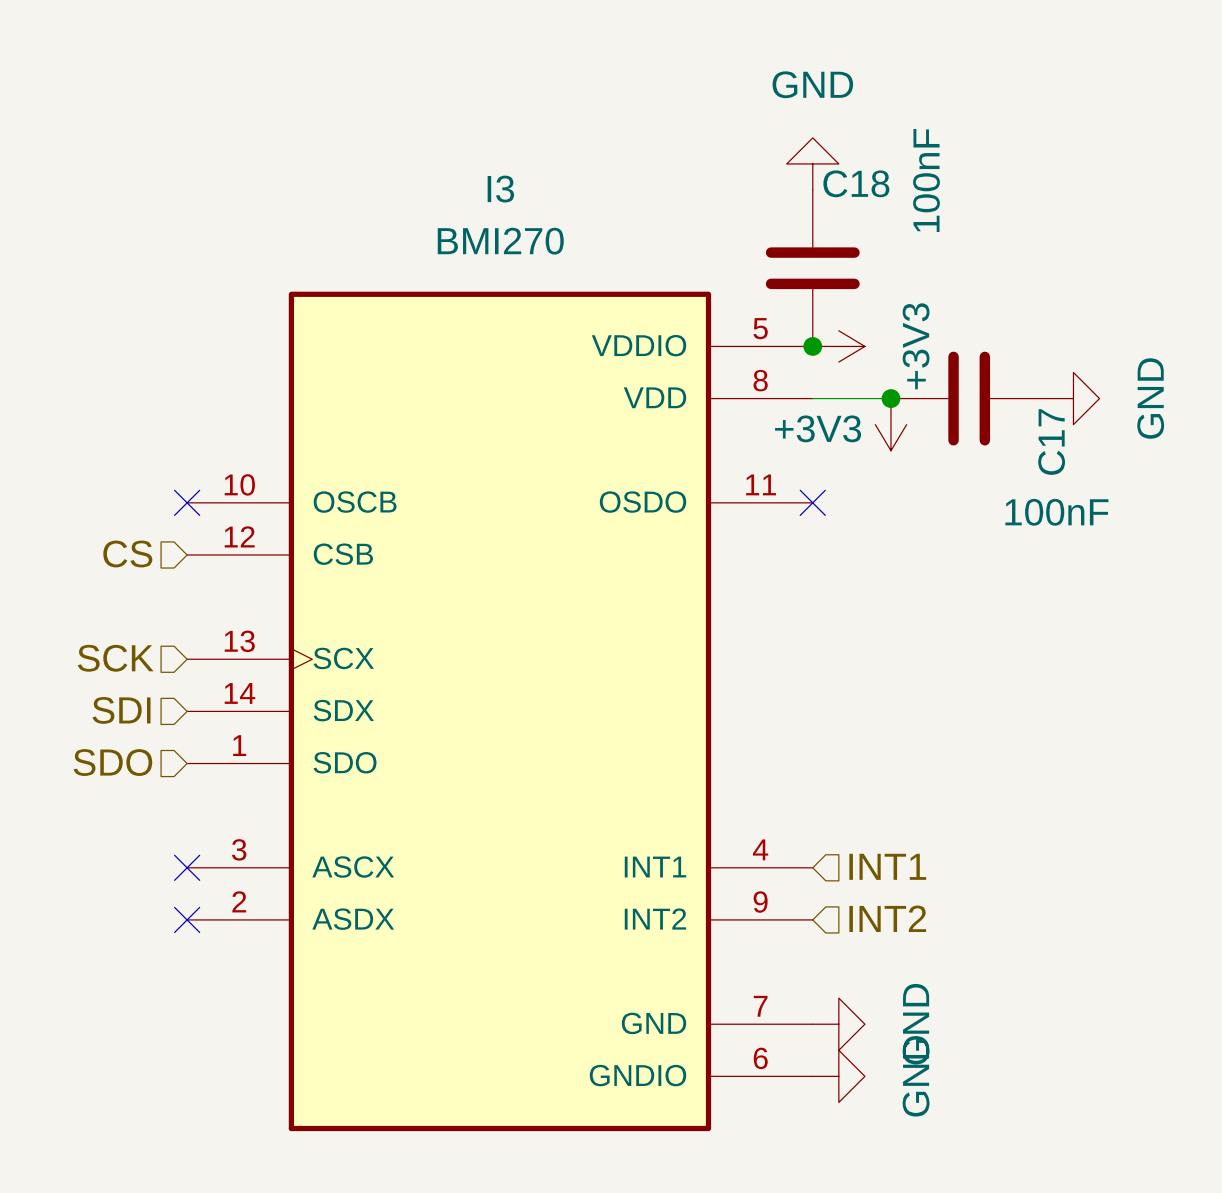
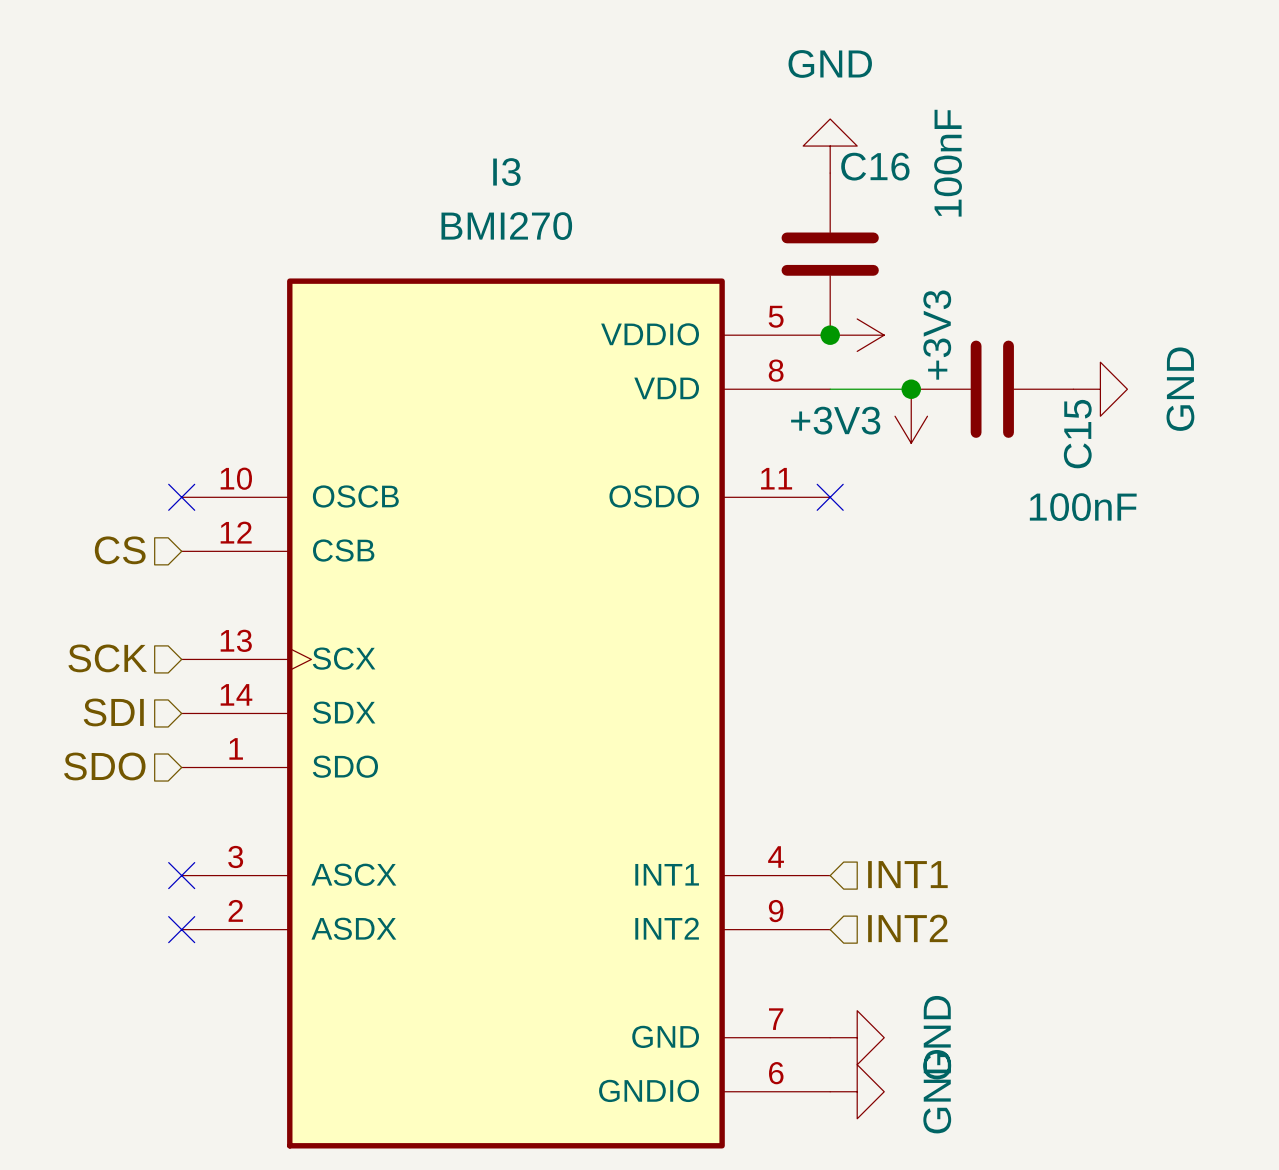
C18 name: C18 (856, 183) -> C16 (875, 166)
C17 name: C17 (1051, 442) -> C15 (1077, 434)

